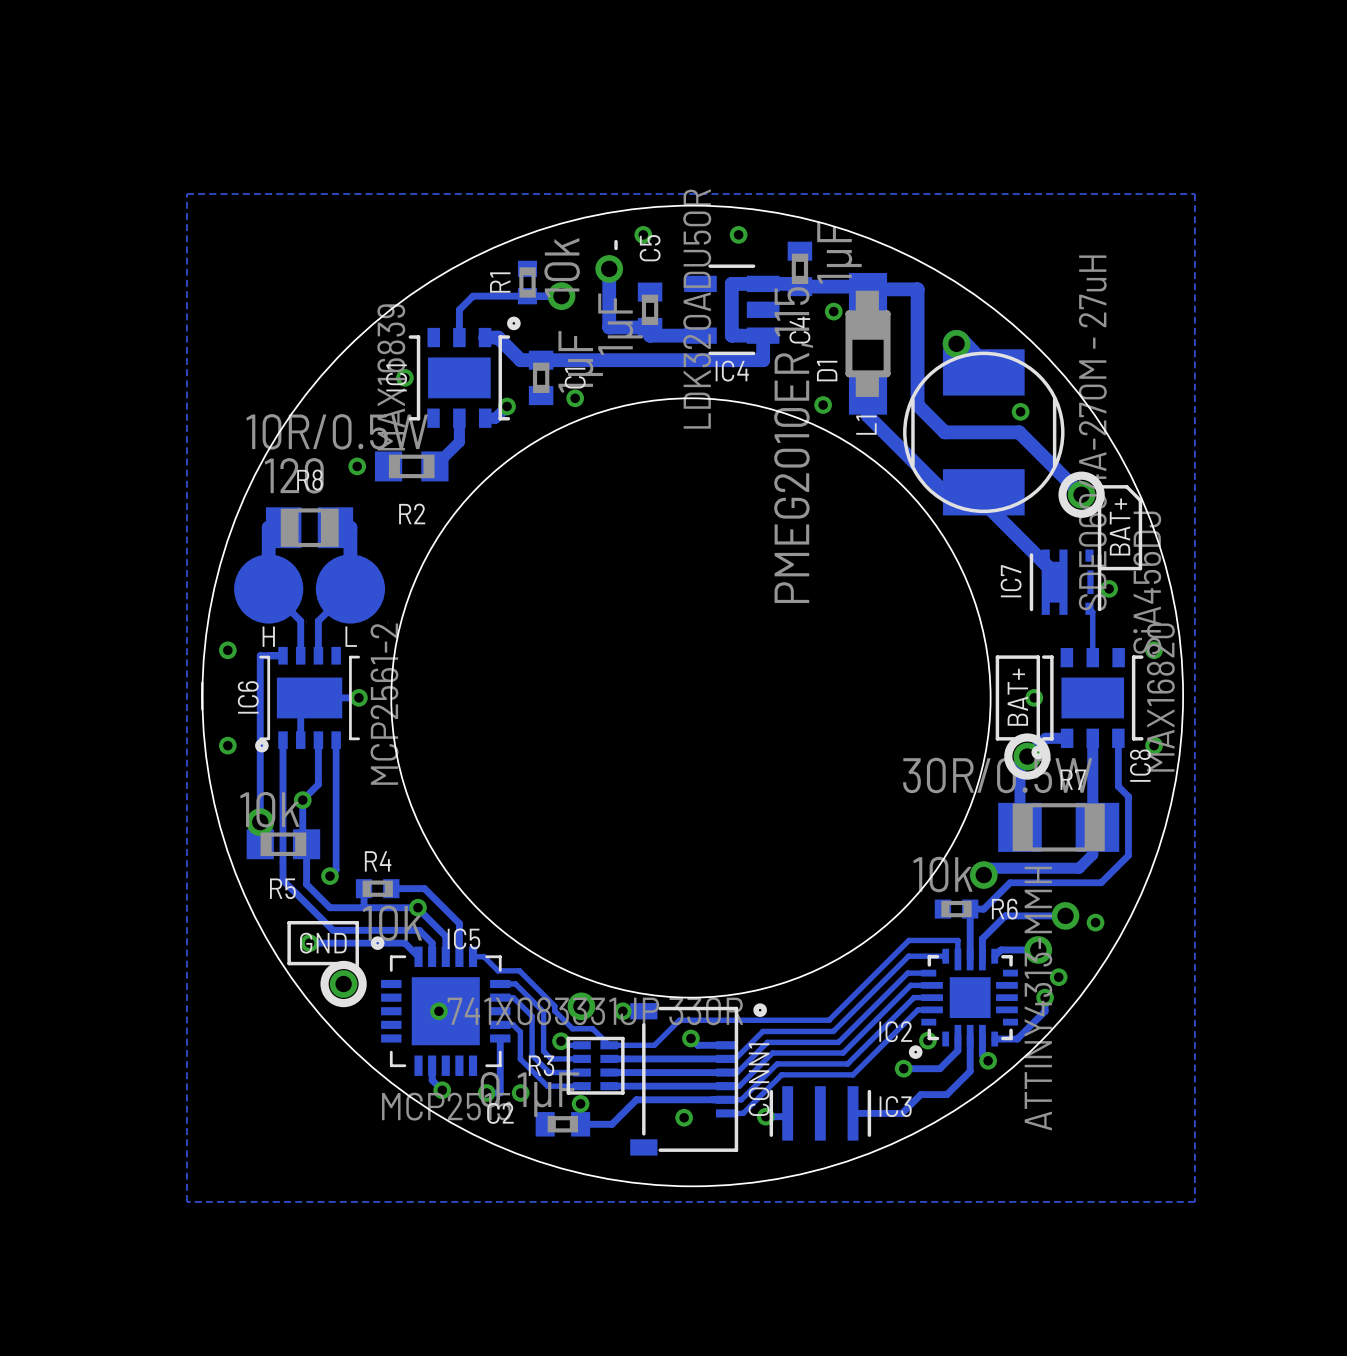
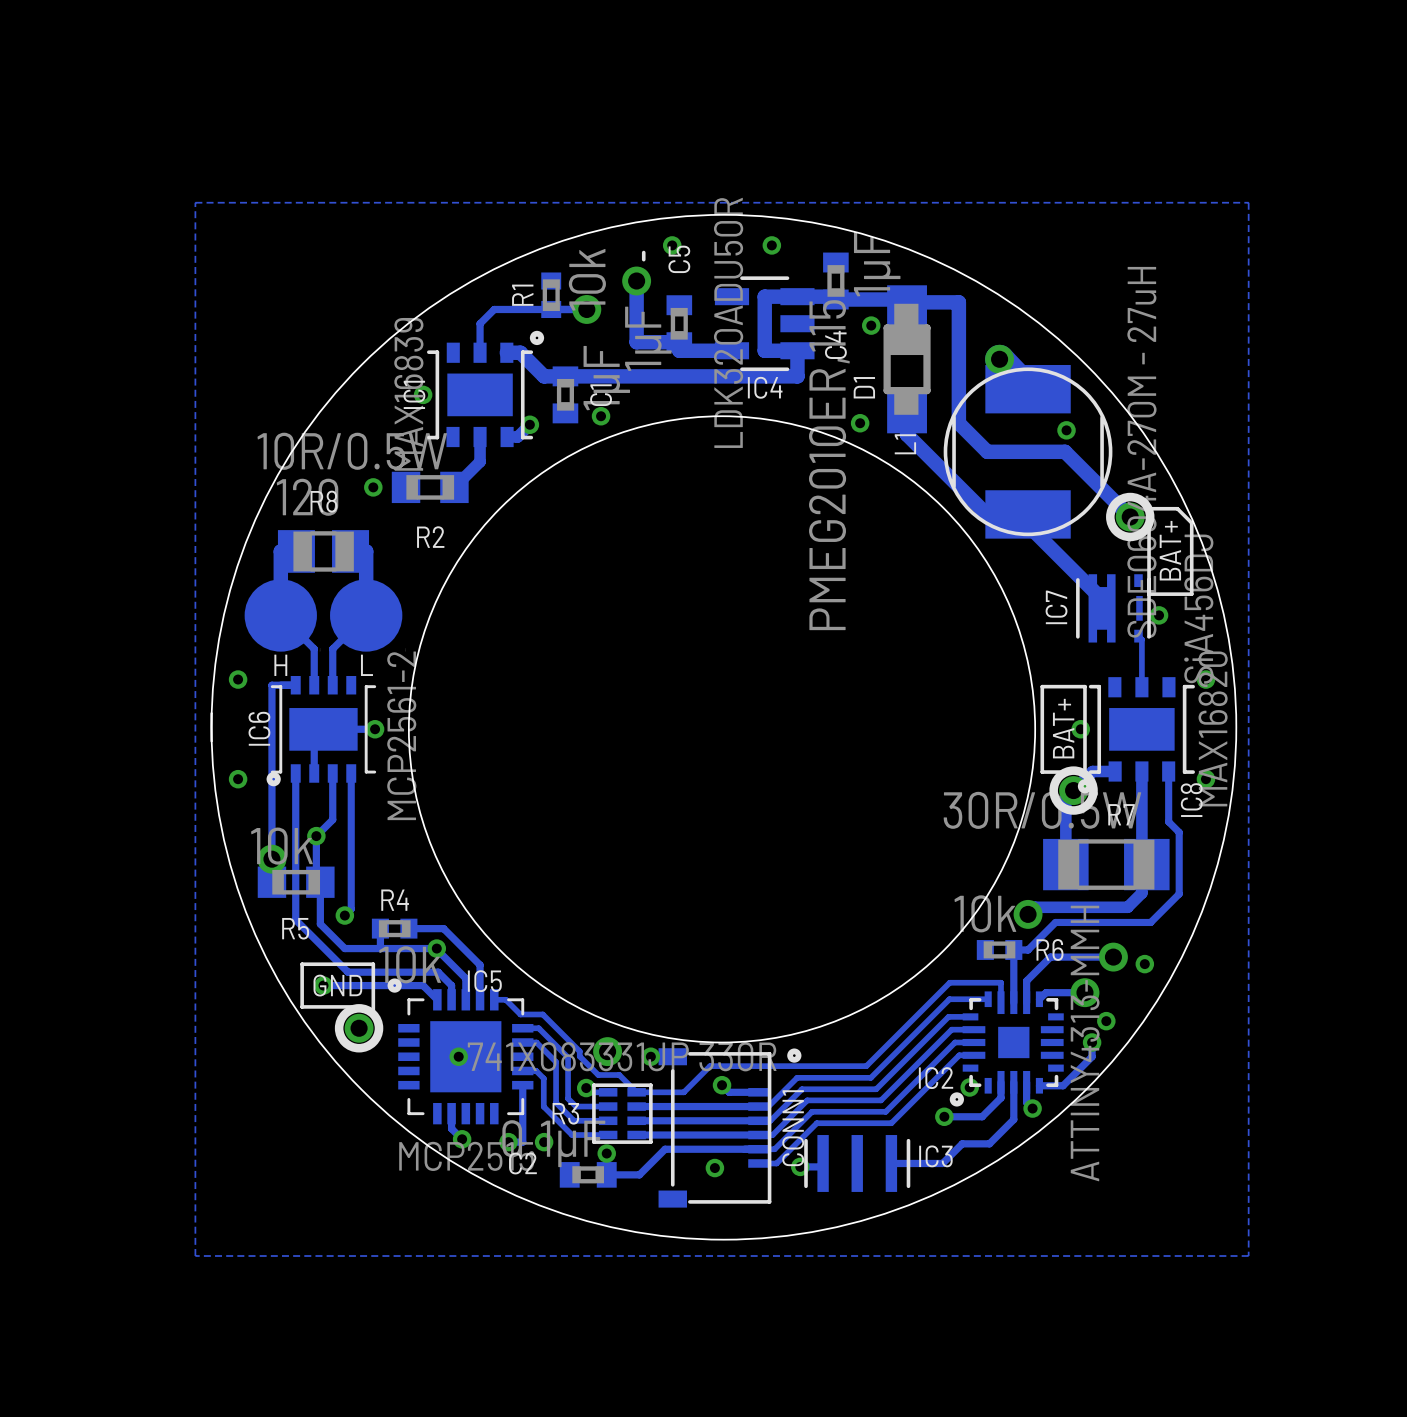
IC2 footprint: [908, 948, 1018, 1059] -> [949, 991, 1064, 1107]

